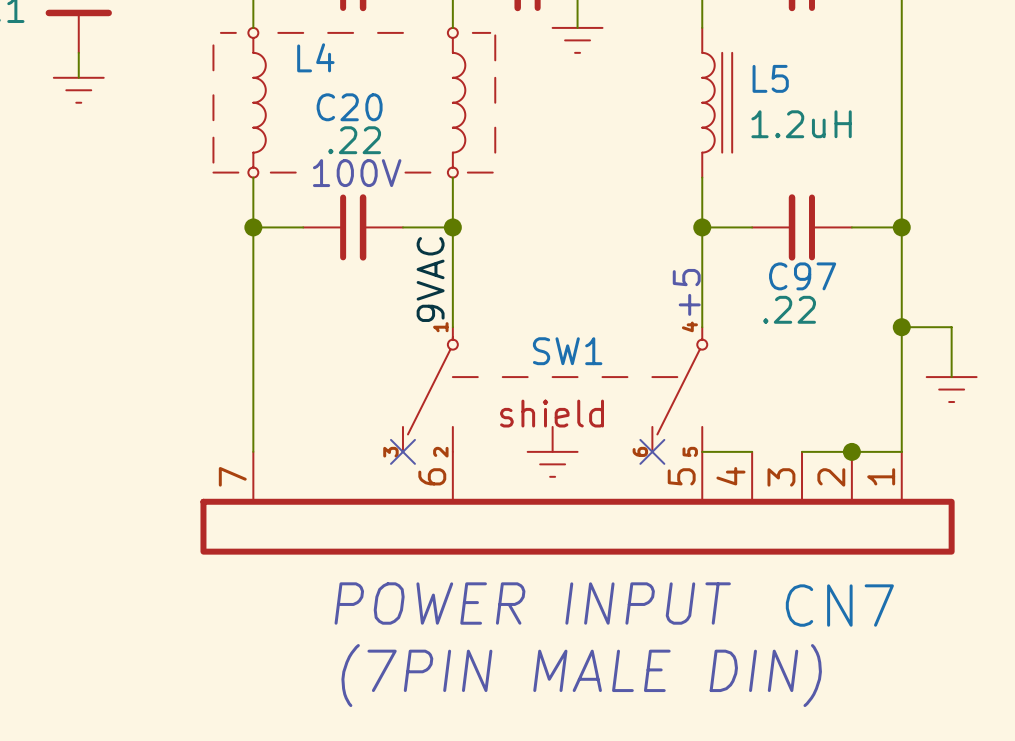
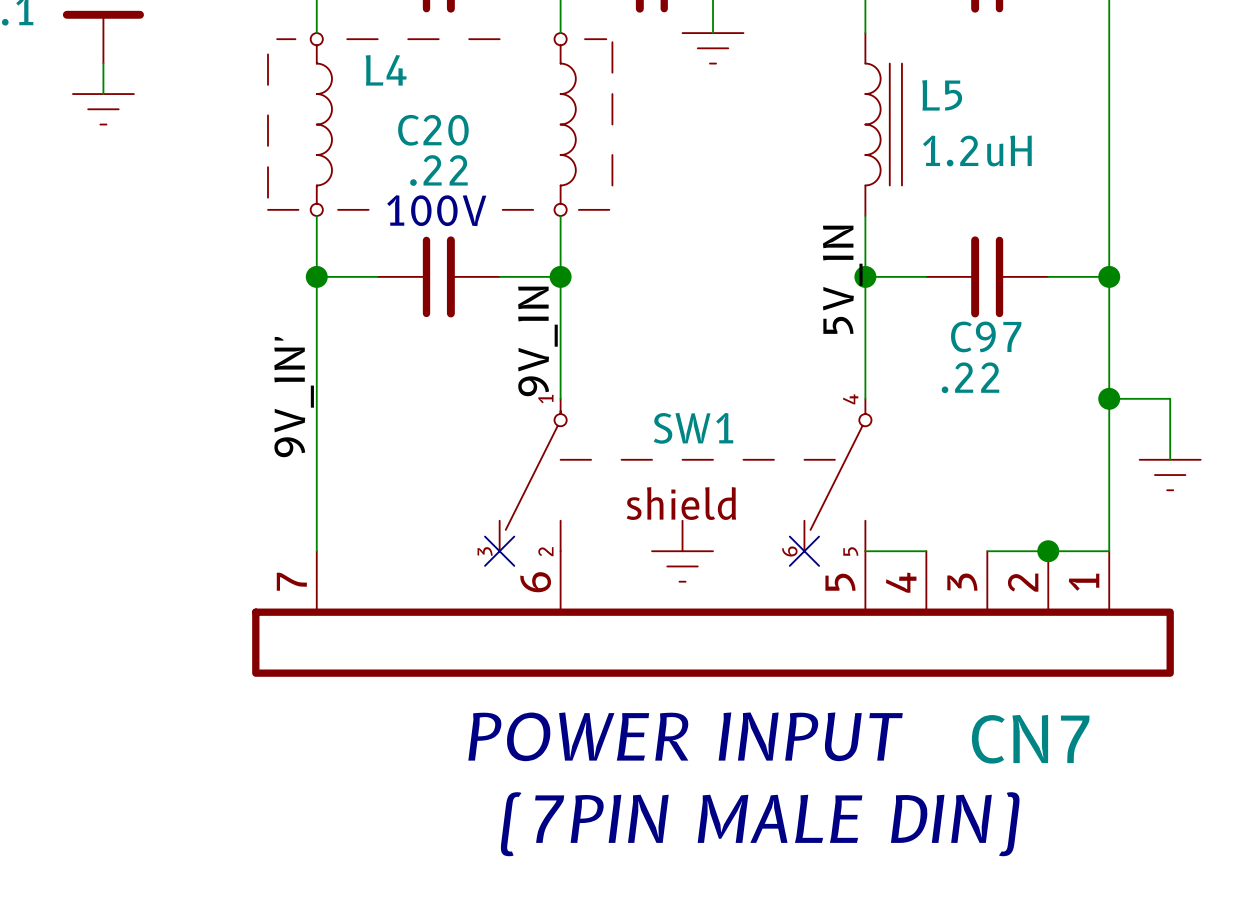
label: none -> 5V_IN (842, 279)
label: 9VAC (430, 279) -> 9V_IN (537, 341)
text: +5 (686, 292) -> none
label: none -> 9V_IN' (294, 397)

